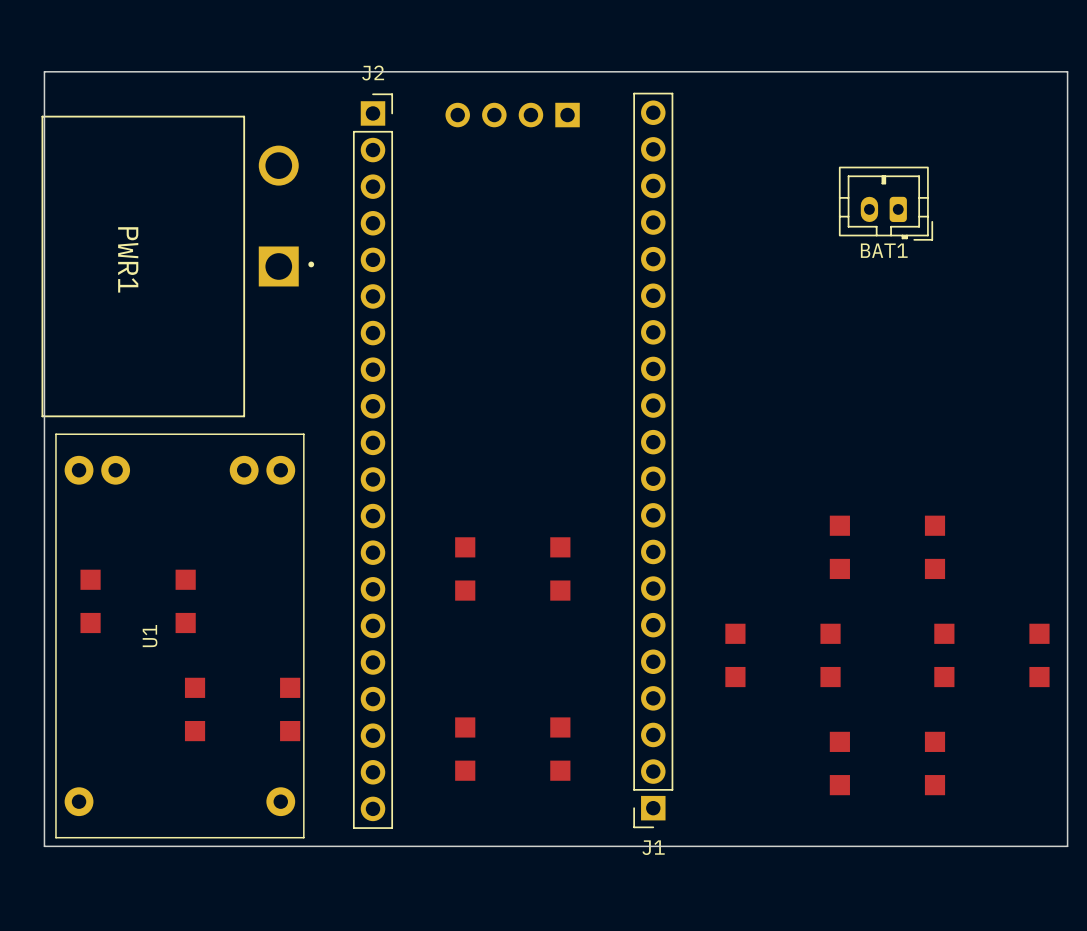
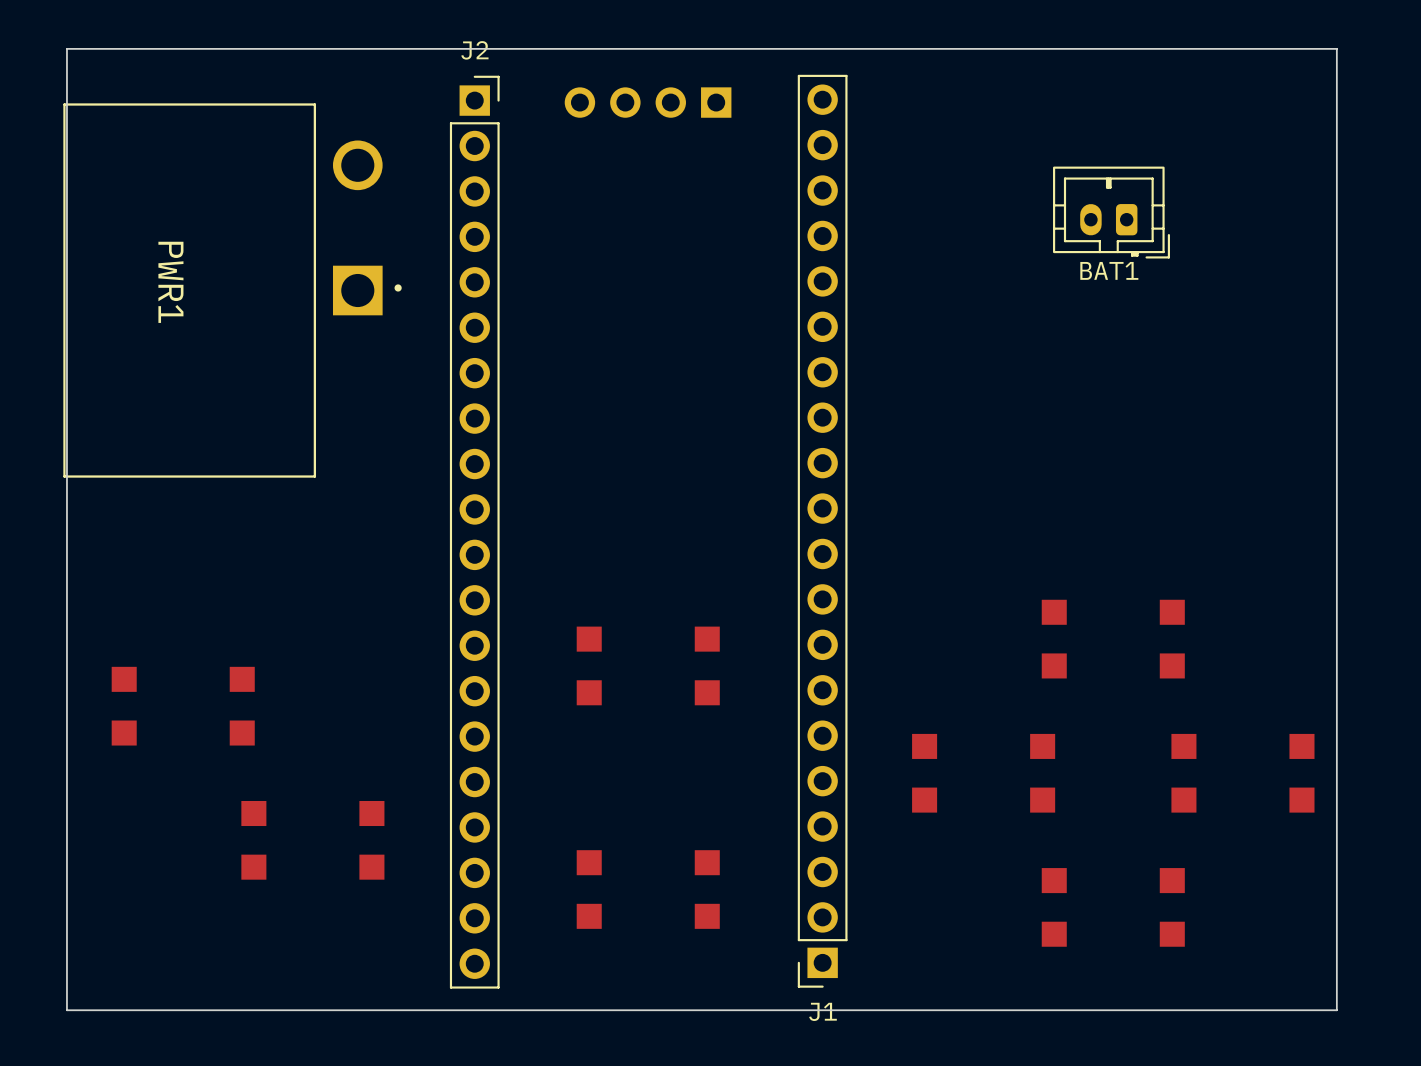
U1: (179, 635) -> none

